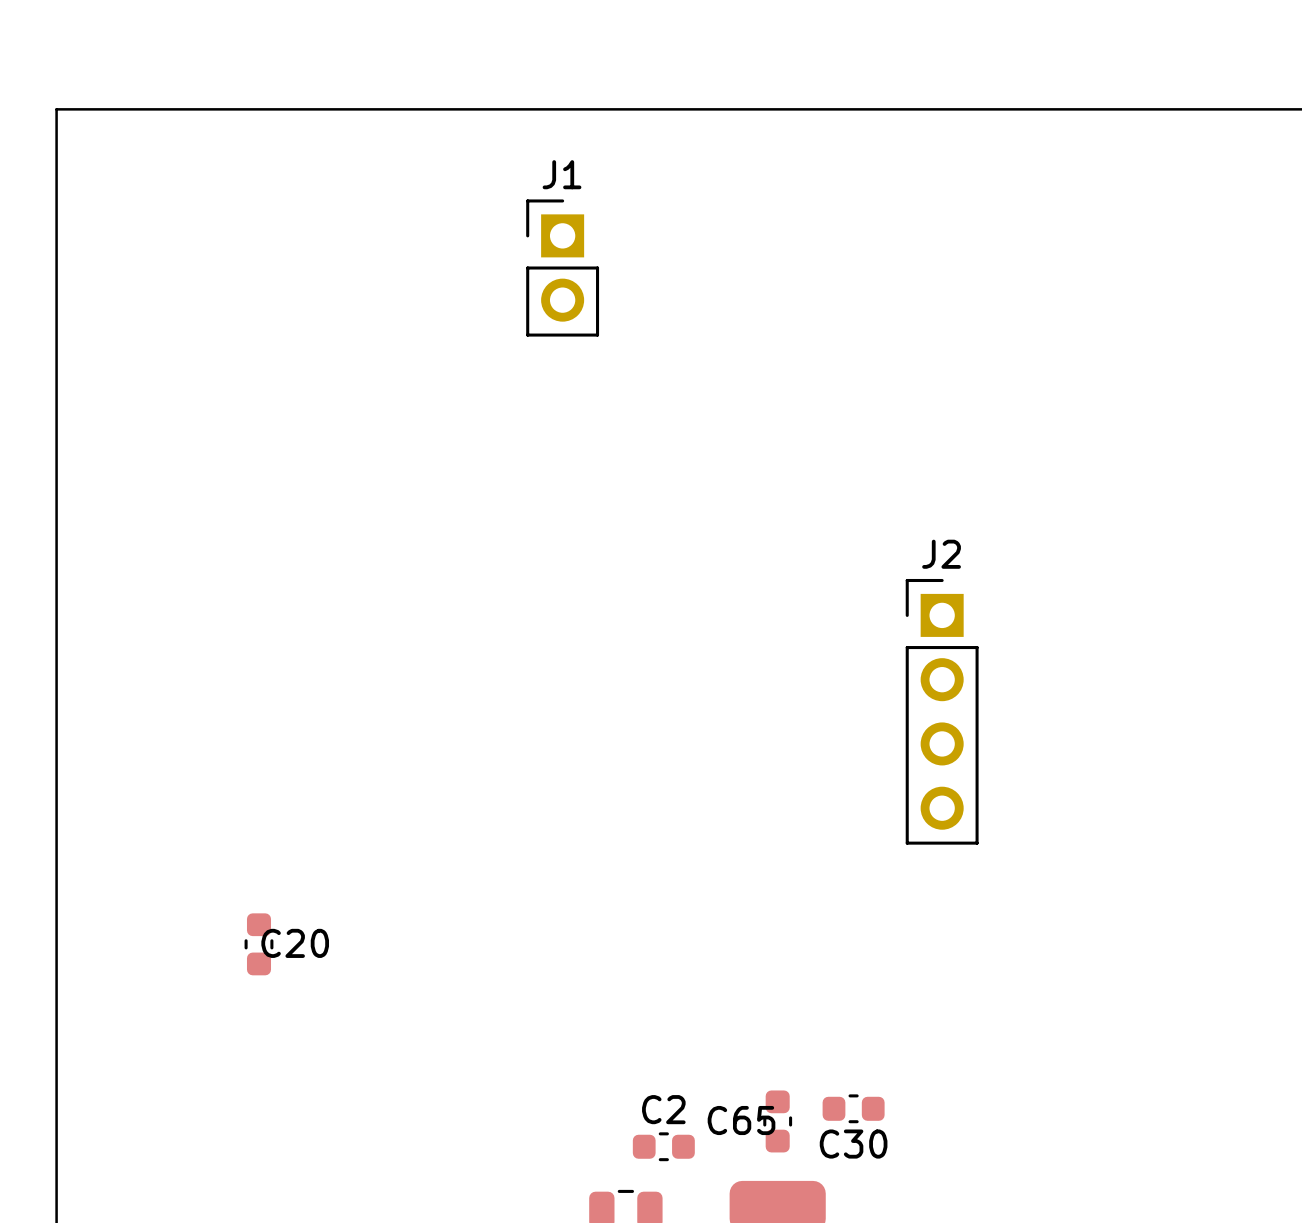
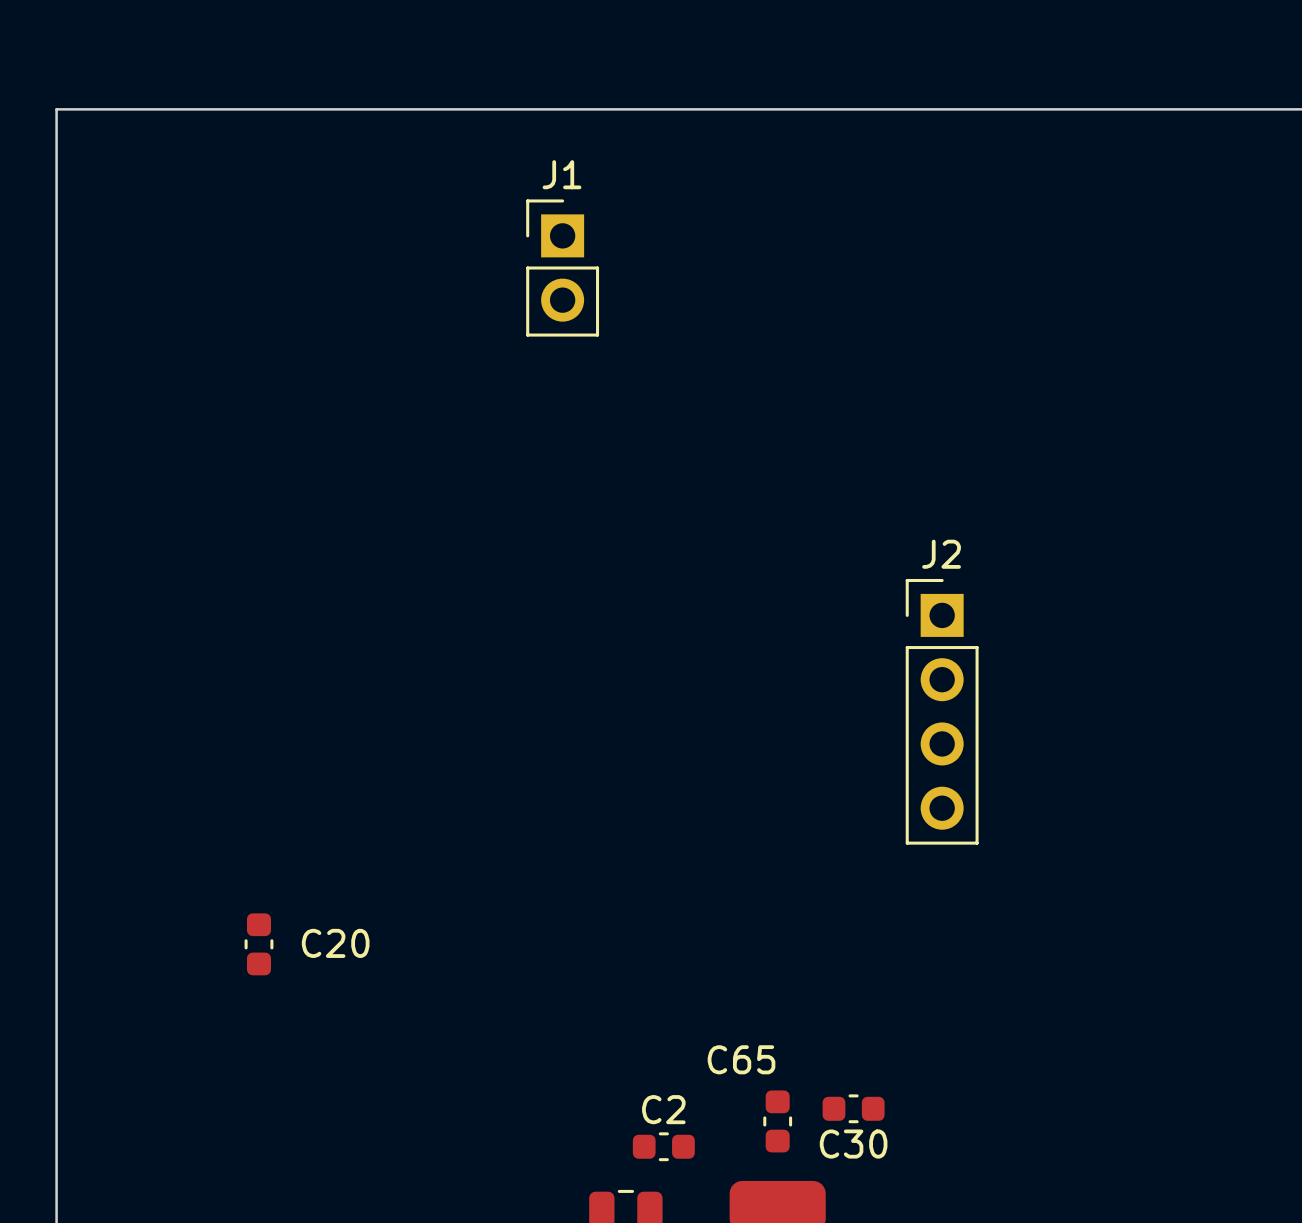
C20 name position: C20 (295, 943) -> C20 (335, 943)
C65 name position: C65 (741, 1120) -> C65 (741, 1059)

